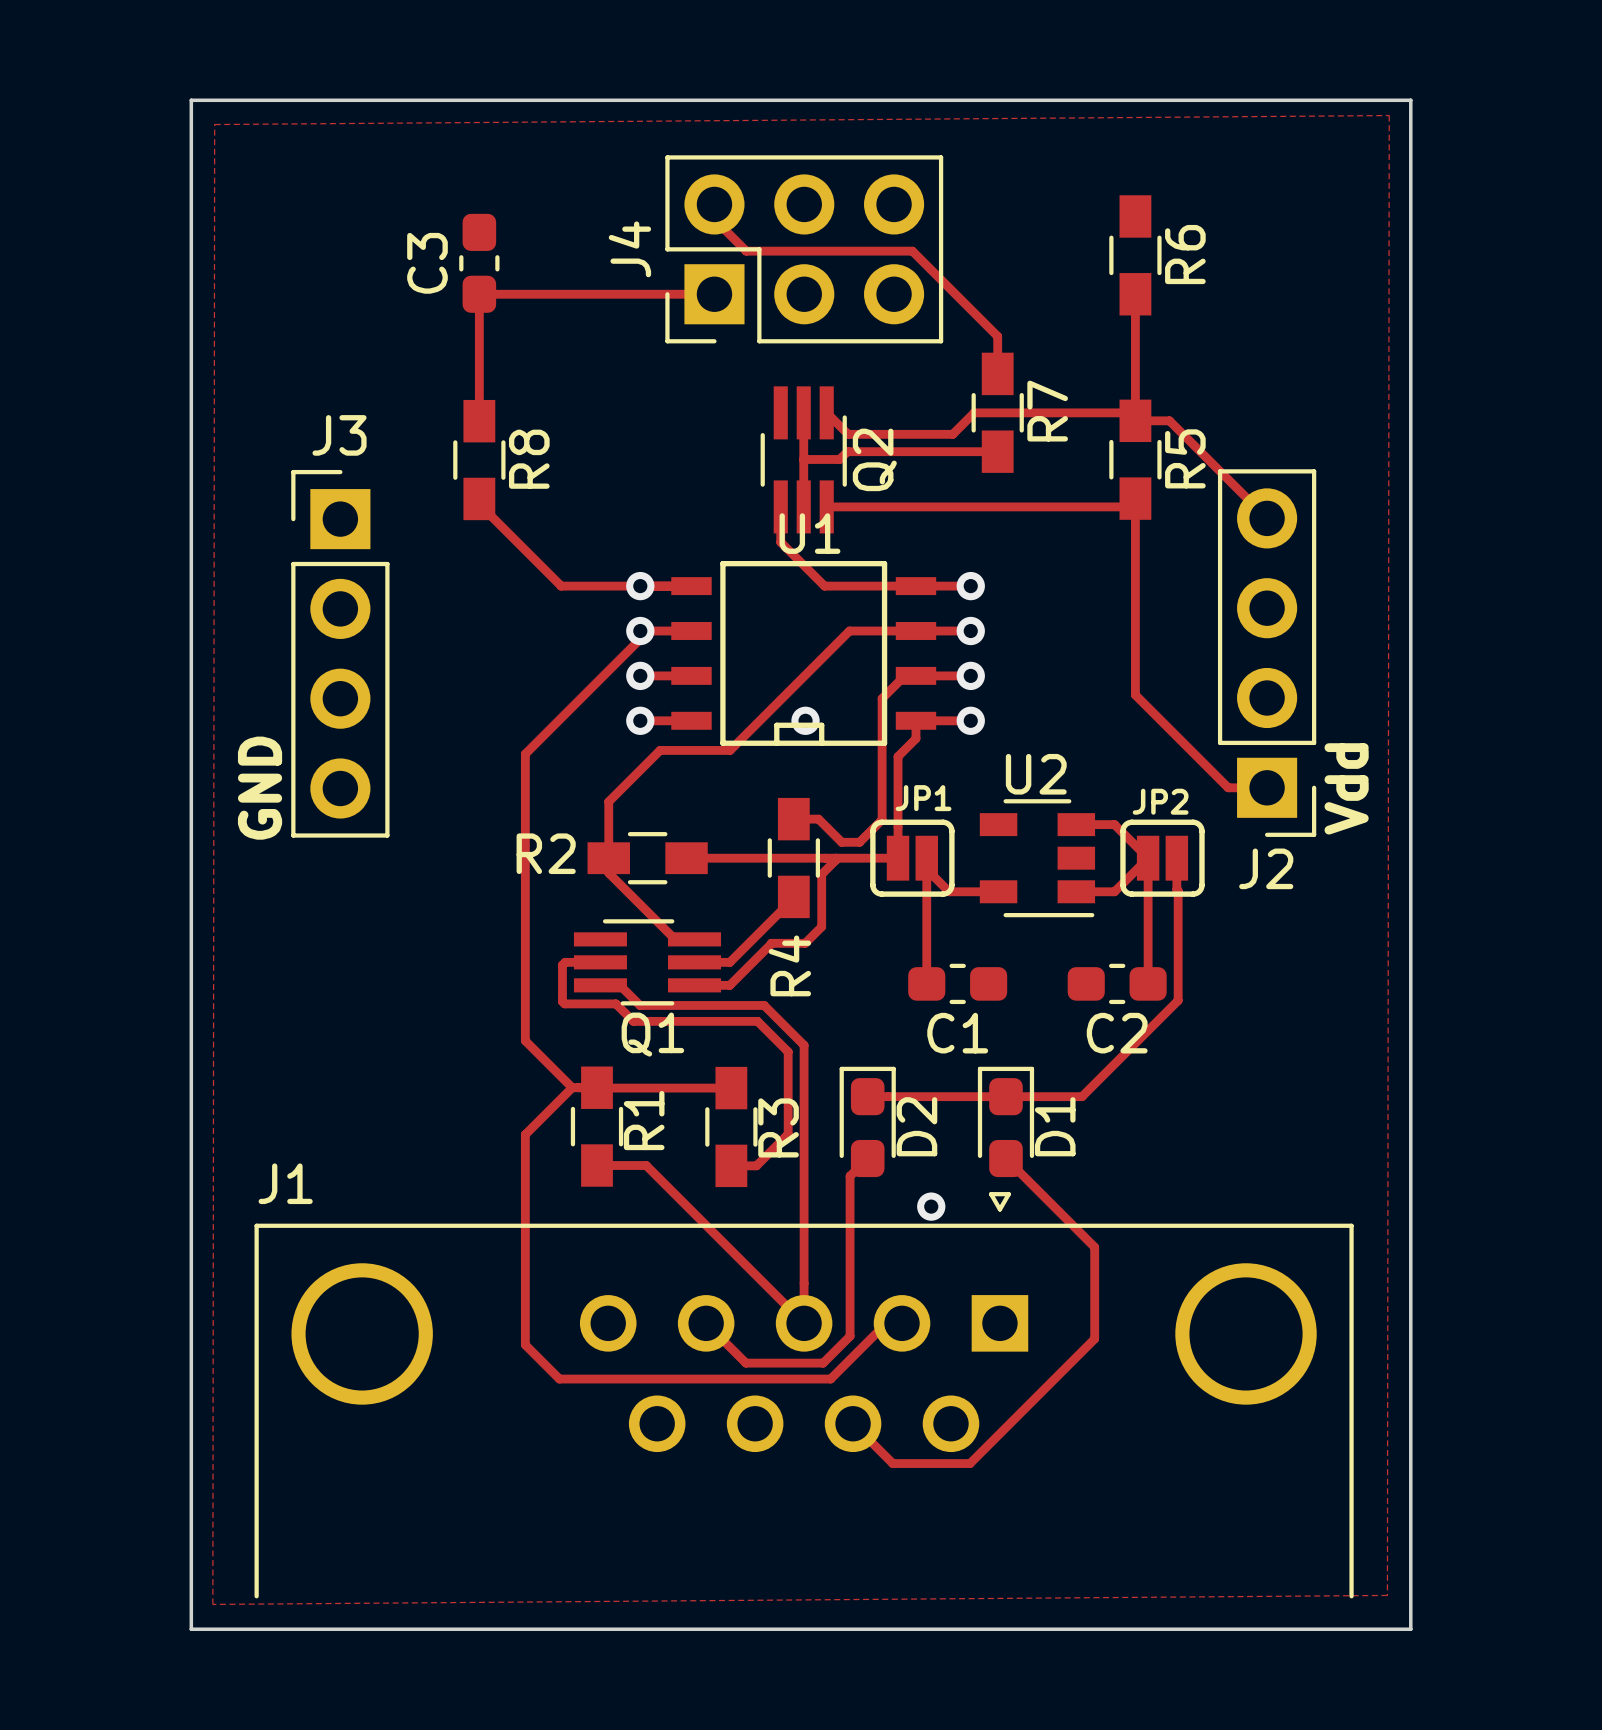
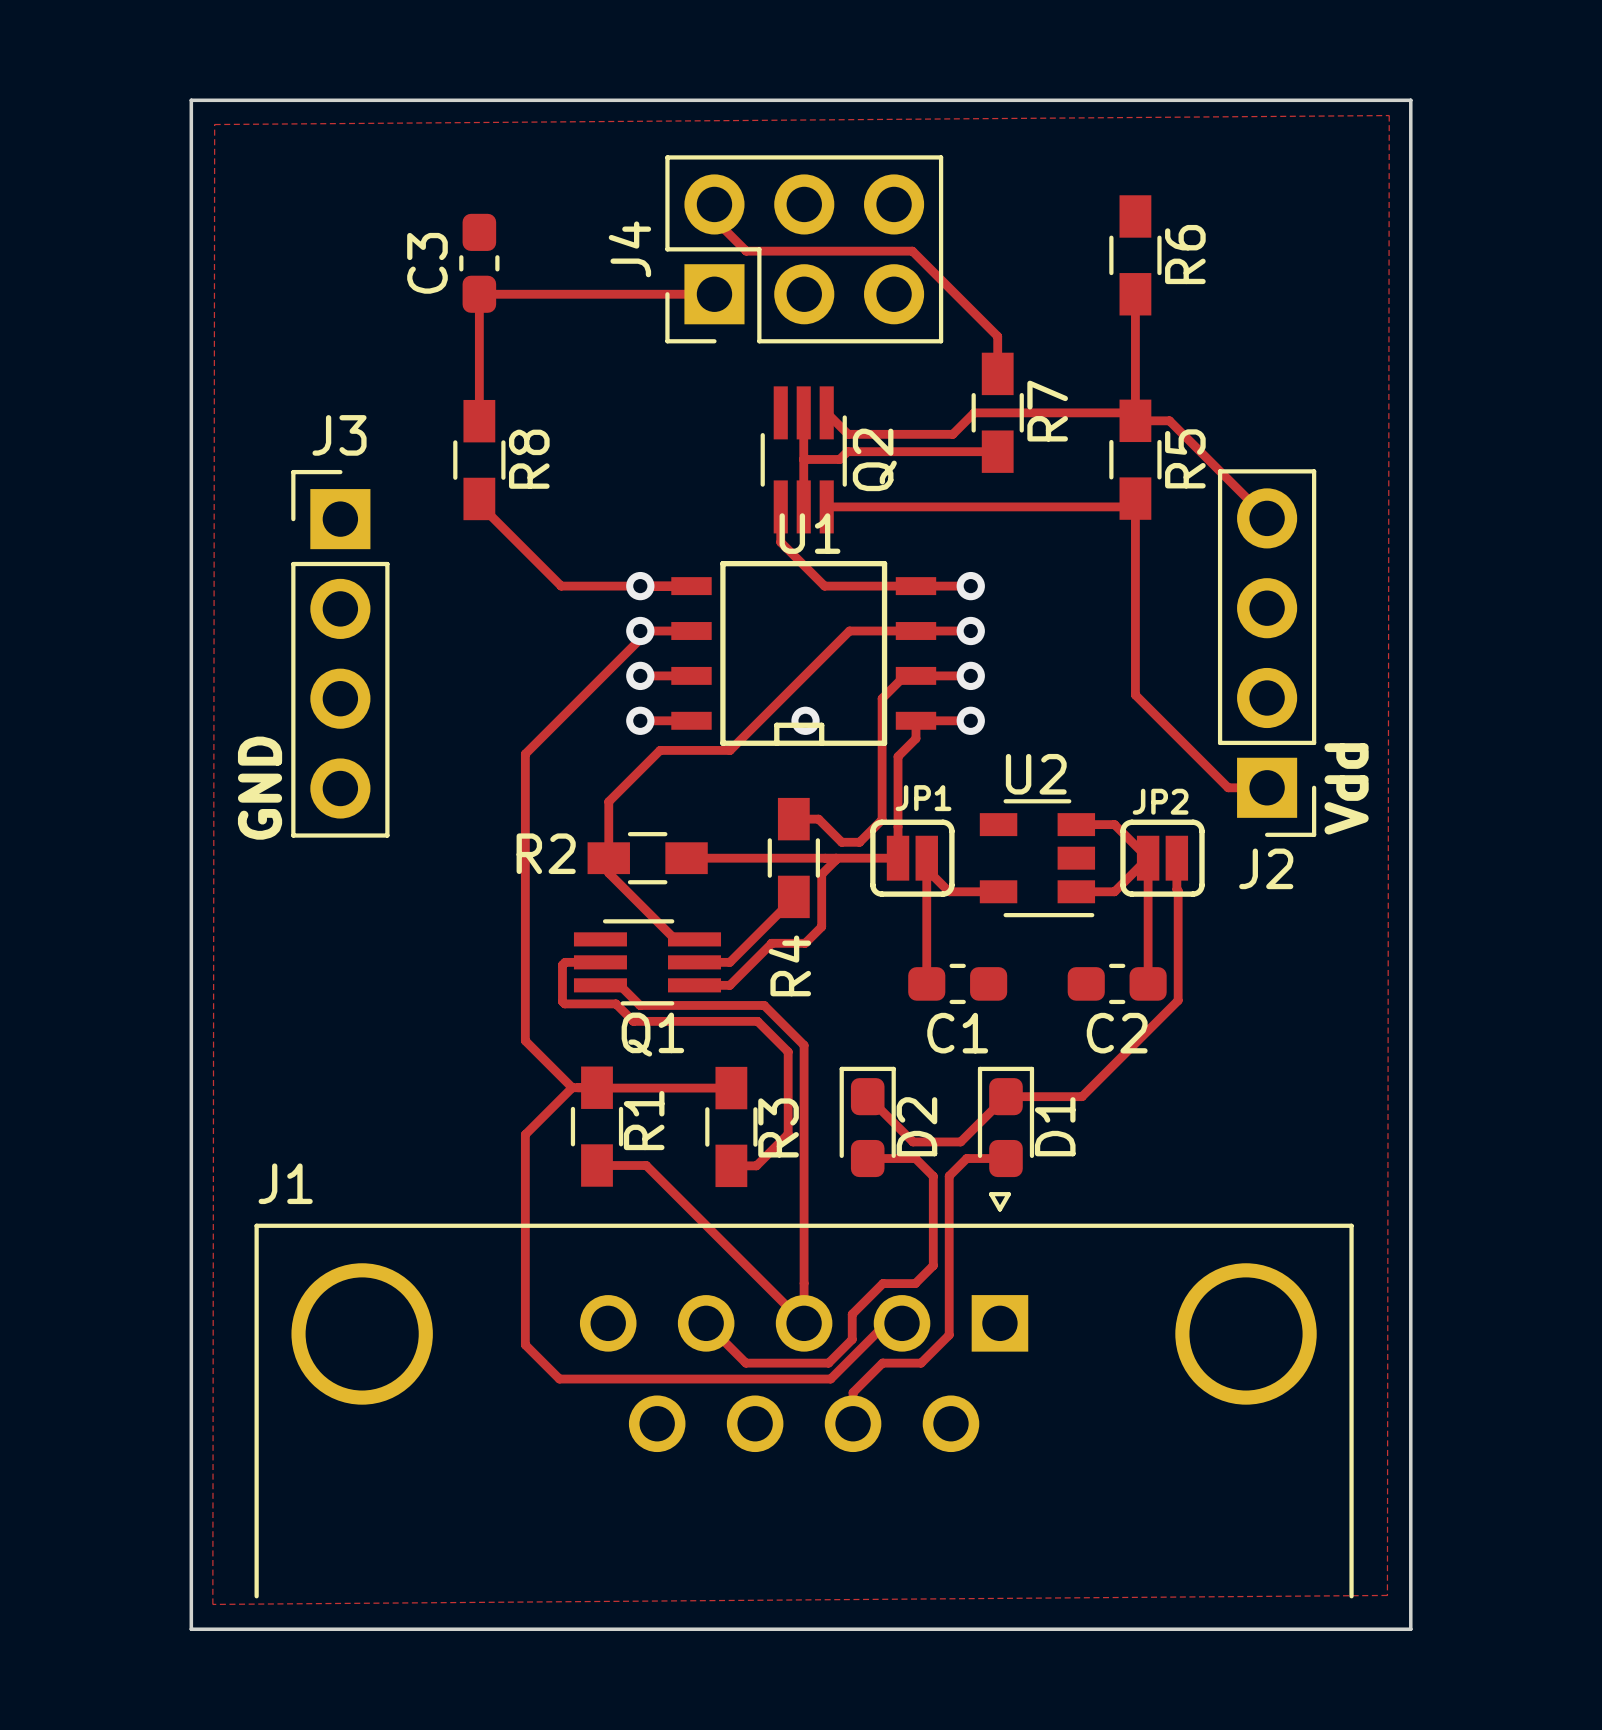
track: (867, 1096) (1005, 1096) -> (867, 1096) (913, 1141) (960, 1141) (1005, 1096)
track: (867, 1158) (850, 1176) (850, 1336) (823, 1363) -> (867, 1158) (915, 1158) (933, 1176) (933, 1265) (915, 1283) (882, 1283) (852, 1314) (852, 1339) (828, 1363) (823, 1363)
track: (1005, 1158) (1094, 1247) (1094, 1338) (970, 1463) (892, 1463) (853, 1423) -> (1005, 1158) (966, 1158) (949, 1176) (949, 1335) (921, 1363) (882, 1363)
via: (931, 1206) -> none
track: none -> (882, 1362) (853, 1392) (853, 1423)

